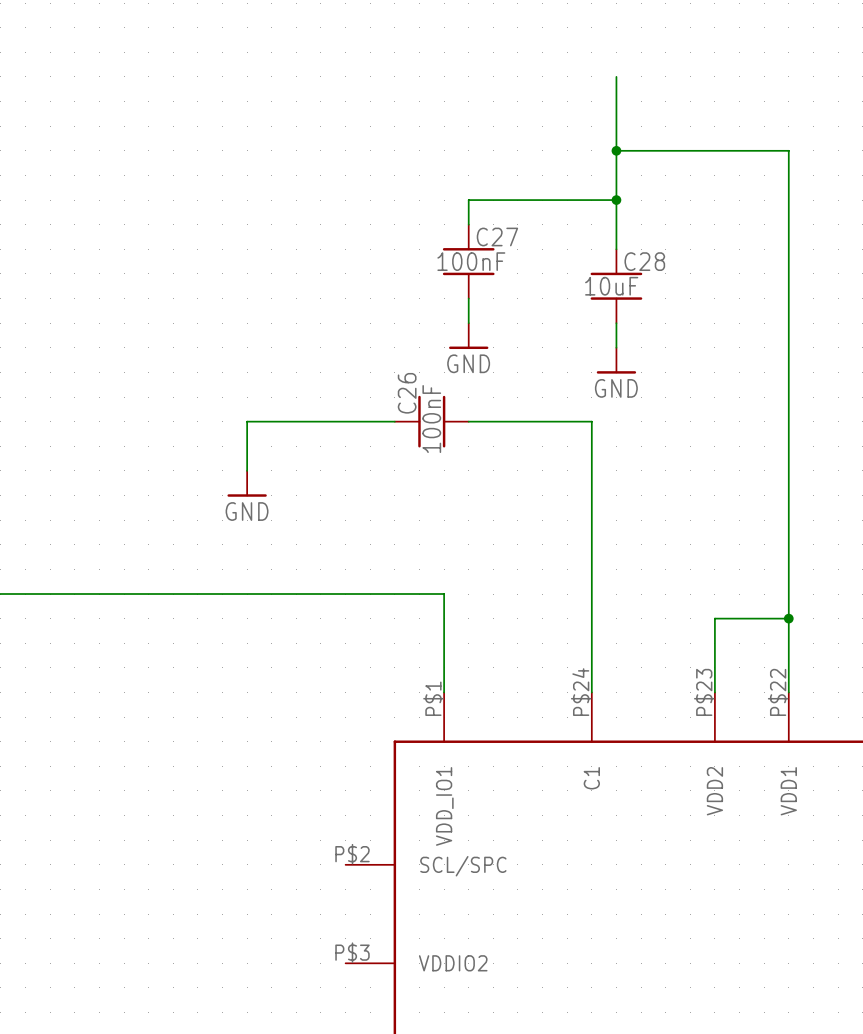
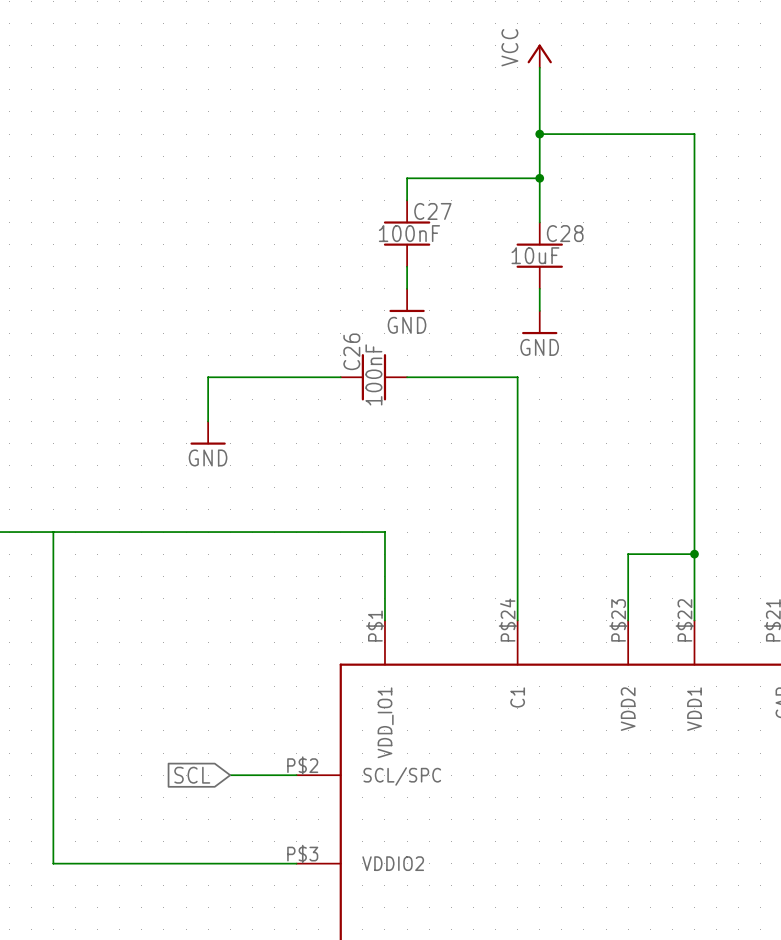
power symbol: none -> VCC (539, 56)
wire: none -> (53, 532) (53, 863) (296, 863)
global label: none -> SCL (192, 775)
wire: none -> (230, 775) (296, 775)

